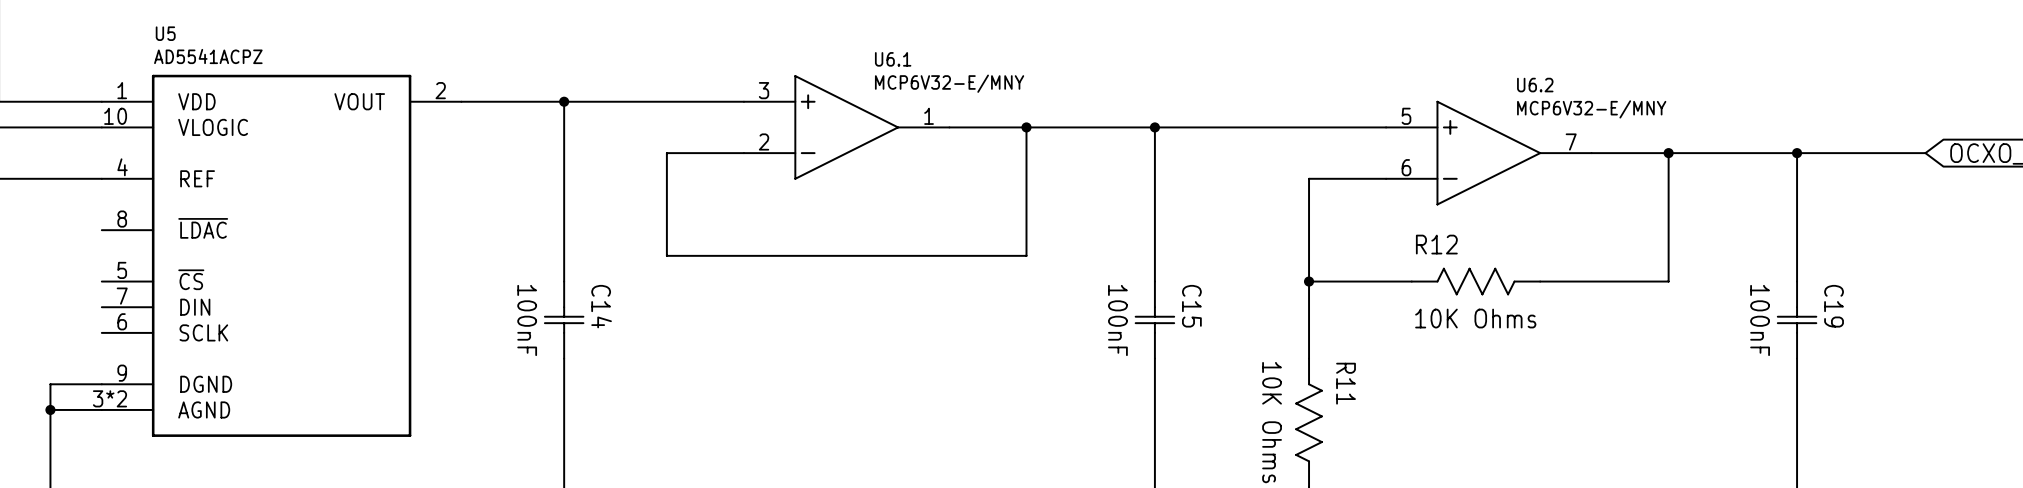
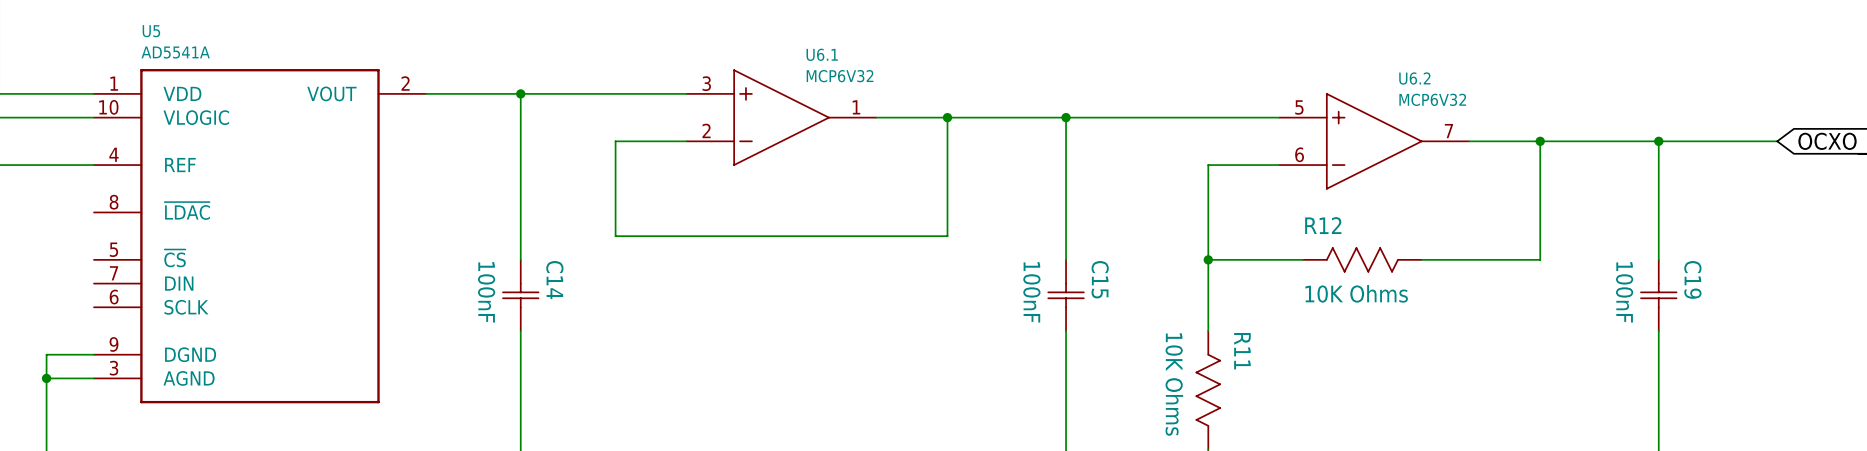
U5 value: AD5541ACPZ (208, 56) -> AD5541A (175, 52)
U6.1 value: MCP6V32-E/MNY (949, 83) -> MCP6V32 (840, 76)
U6.2 value: MCP6V32-E/MNY (1591, 109) -> MCP6V32 (1432, 99)
U5 pin number: 3*2 (109, 398) -> 3 (114, 368)

